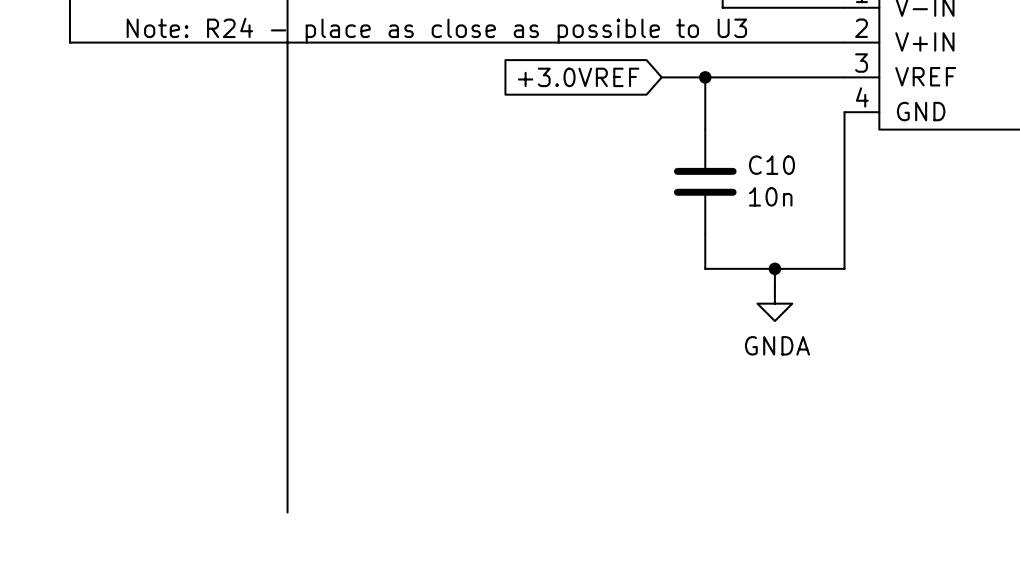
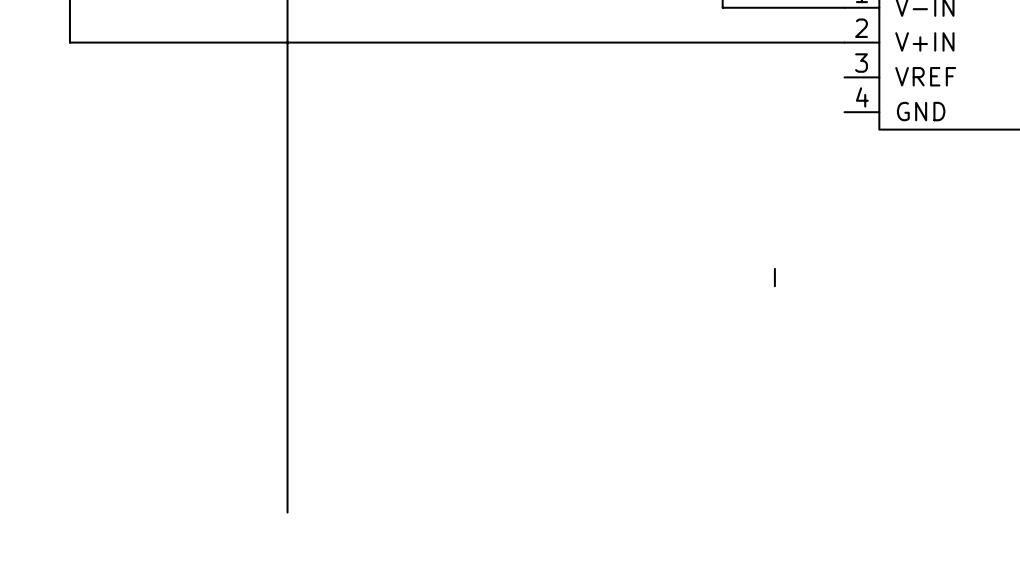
text: Note: R24 - place as close as possible to U3 (436, 30) -> none
global label: +3.0VREF (578, 77) -> none
wire: (661, 77) (844, 77) -> none
wire: (705, 77) (705, 129) -> none
junction: (705, 77) -> none
wire: (844, 112) (844, 268) (705, 268) (705, 234) -> none
C10: 10n (705, 181) -> none
junction: (774, 268) -> none
power symbol: GNDA (774, 303) -> none

